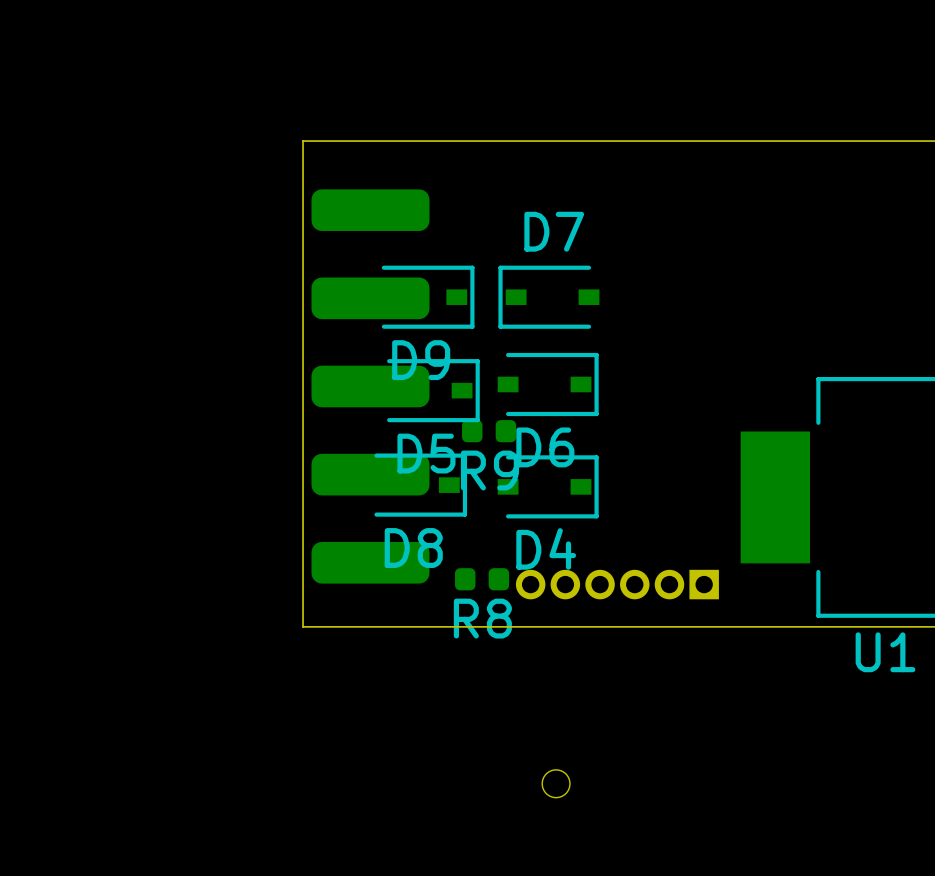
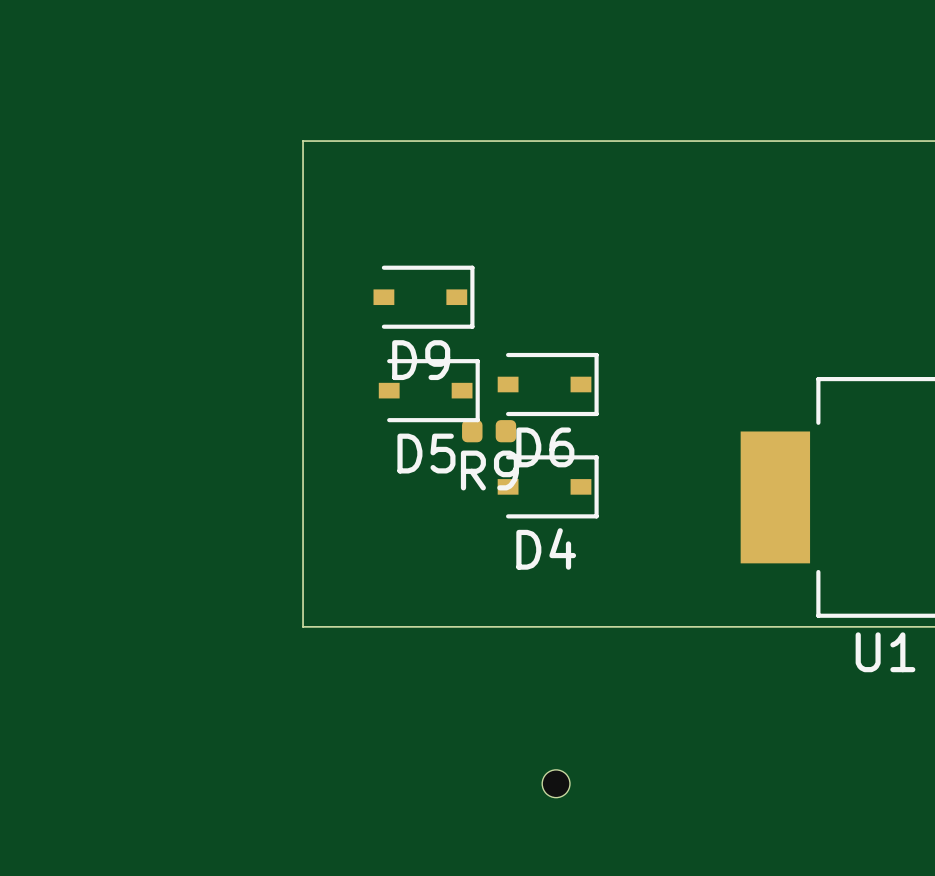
D7: (548, 297) -> none
part: (370, 386) -> none
D8: (416, 485) -> none
R8: (482, 579) -> none
part: (617, 584) -> none

